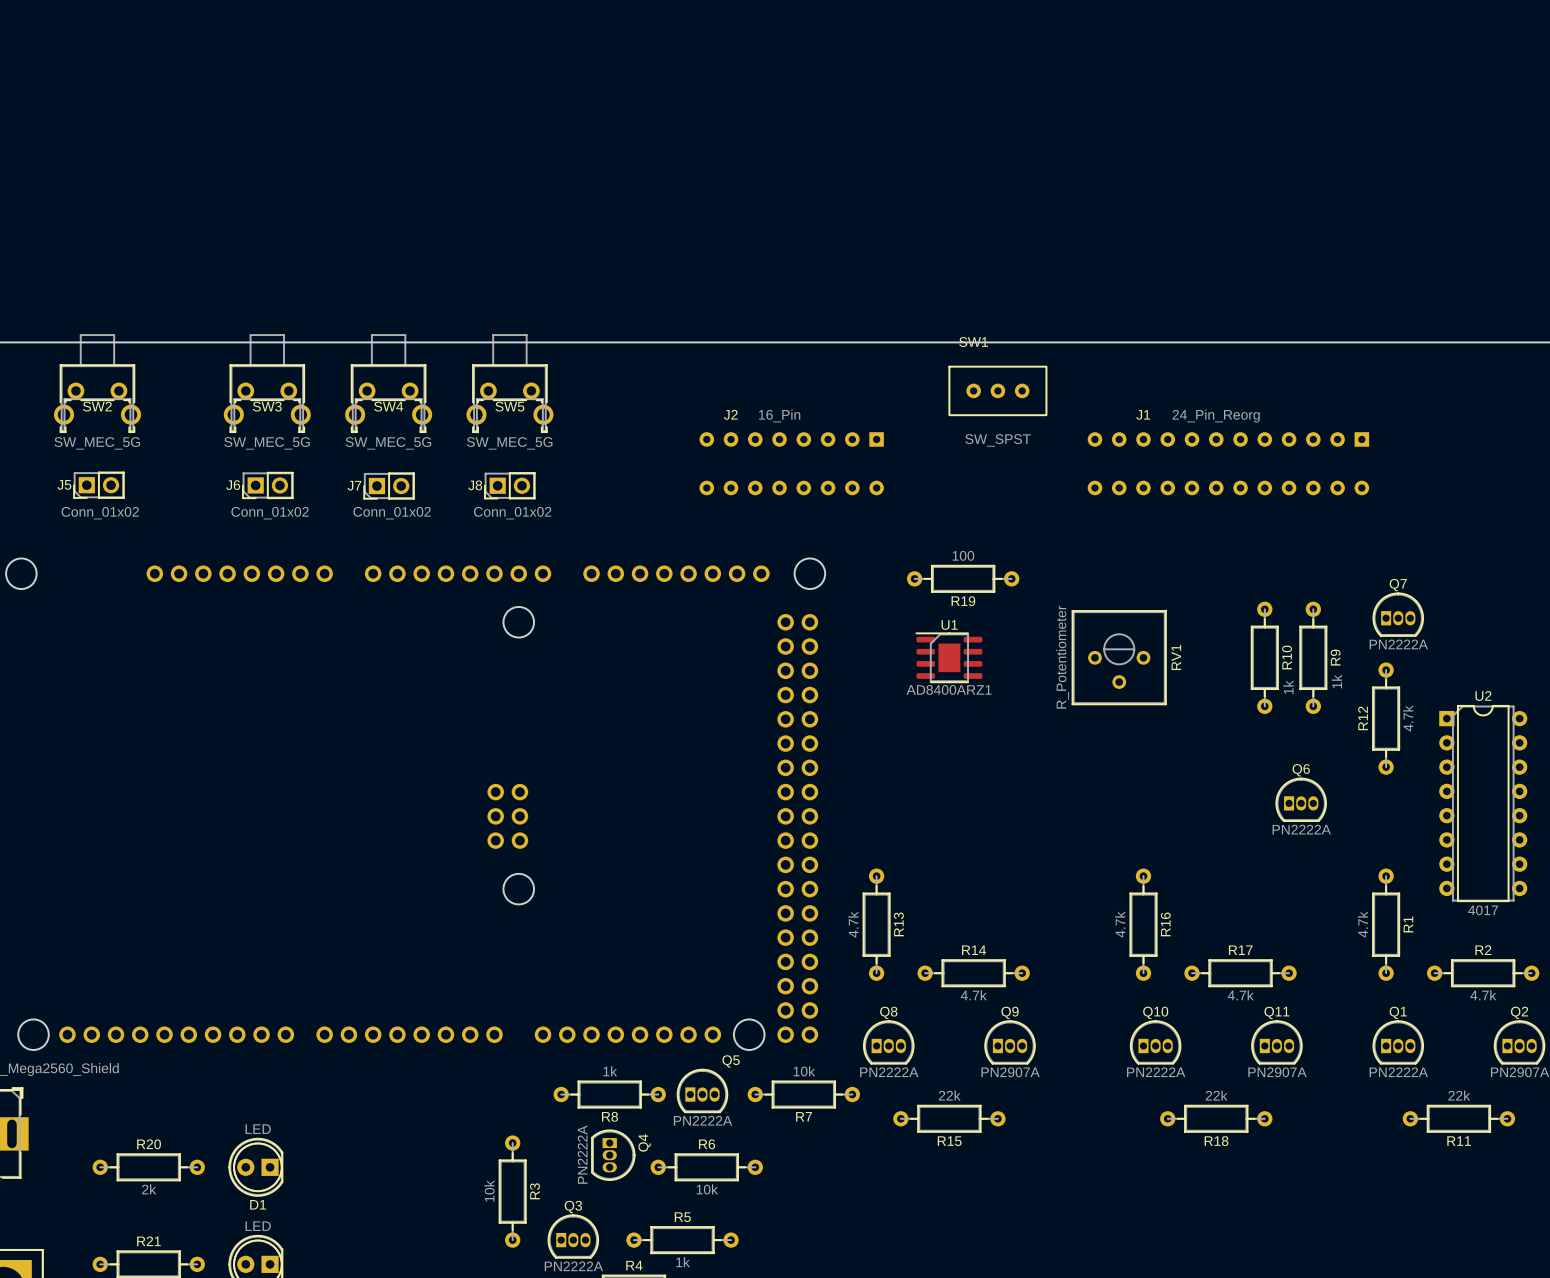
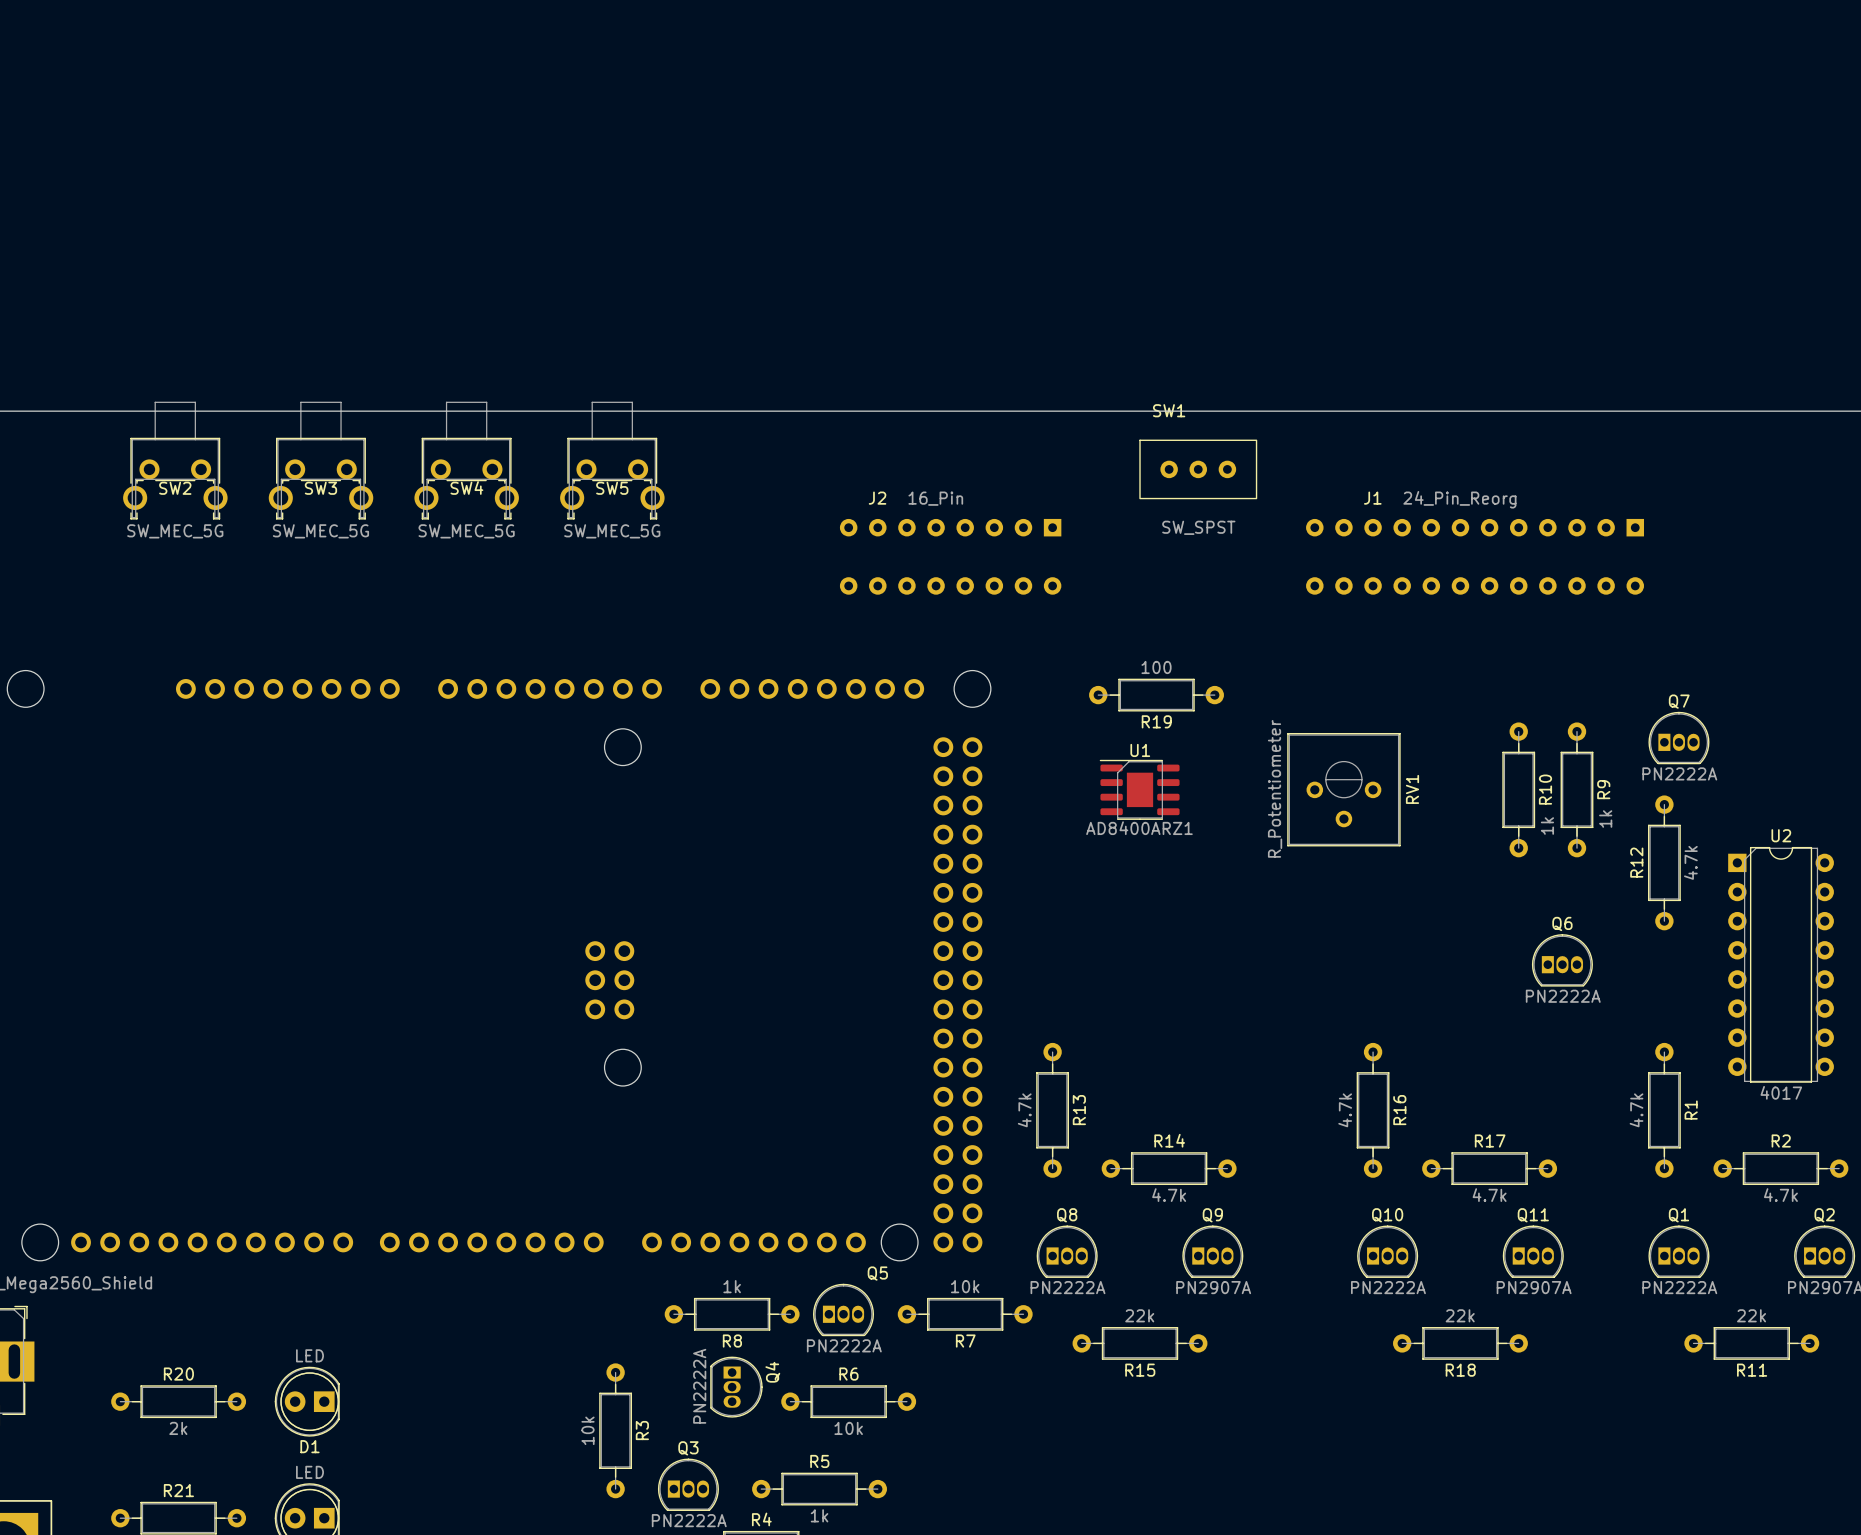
SW2 position: (97, 383) -> (175, 460)
J5: Conn_01x02 (98, 485) -> none
J6: Conn_01x02 (267, 485) -> none
J8: Conn_01x02 (509, 485) -> none
J7: Conn_01x02 (389, 486) -> none

